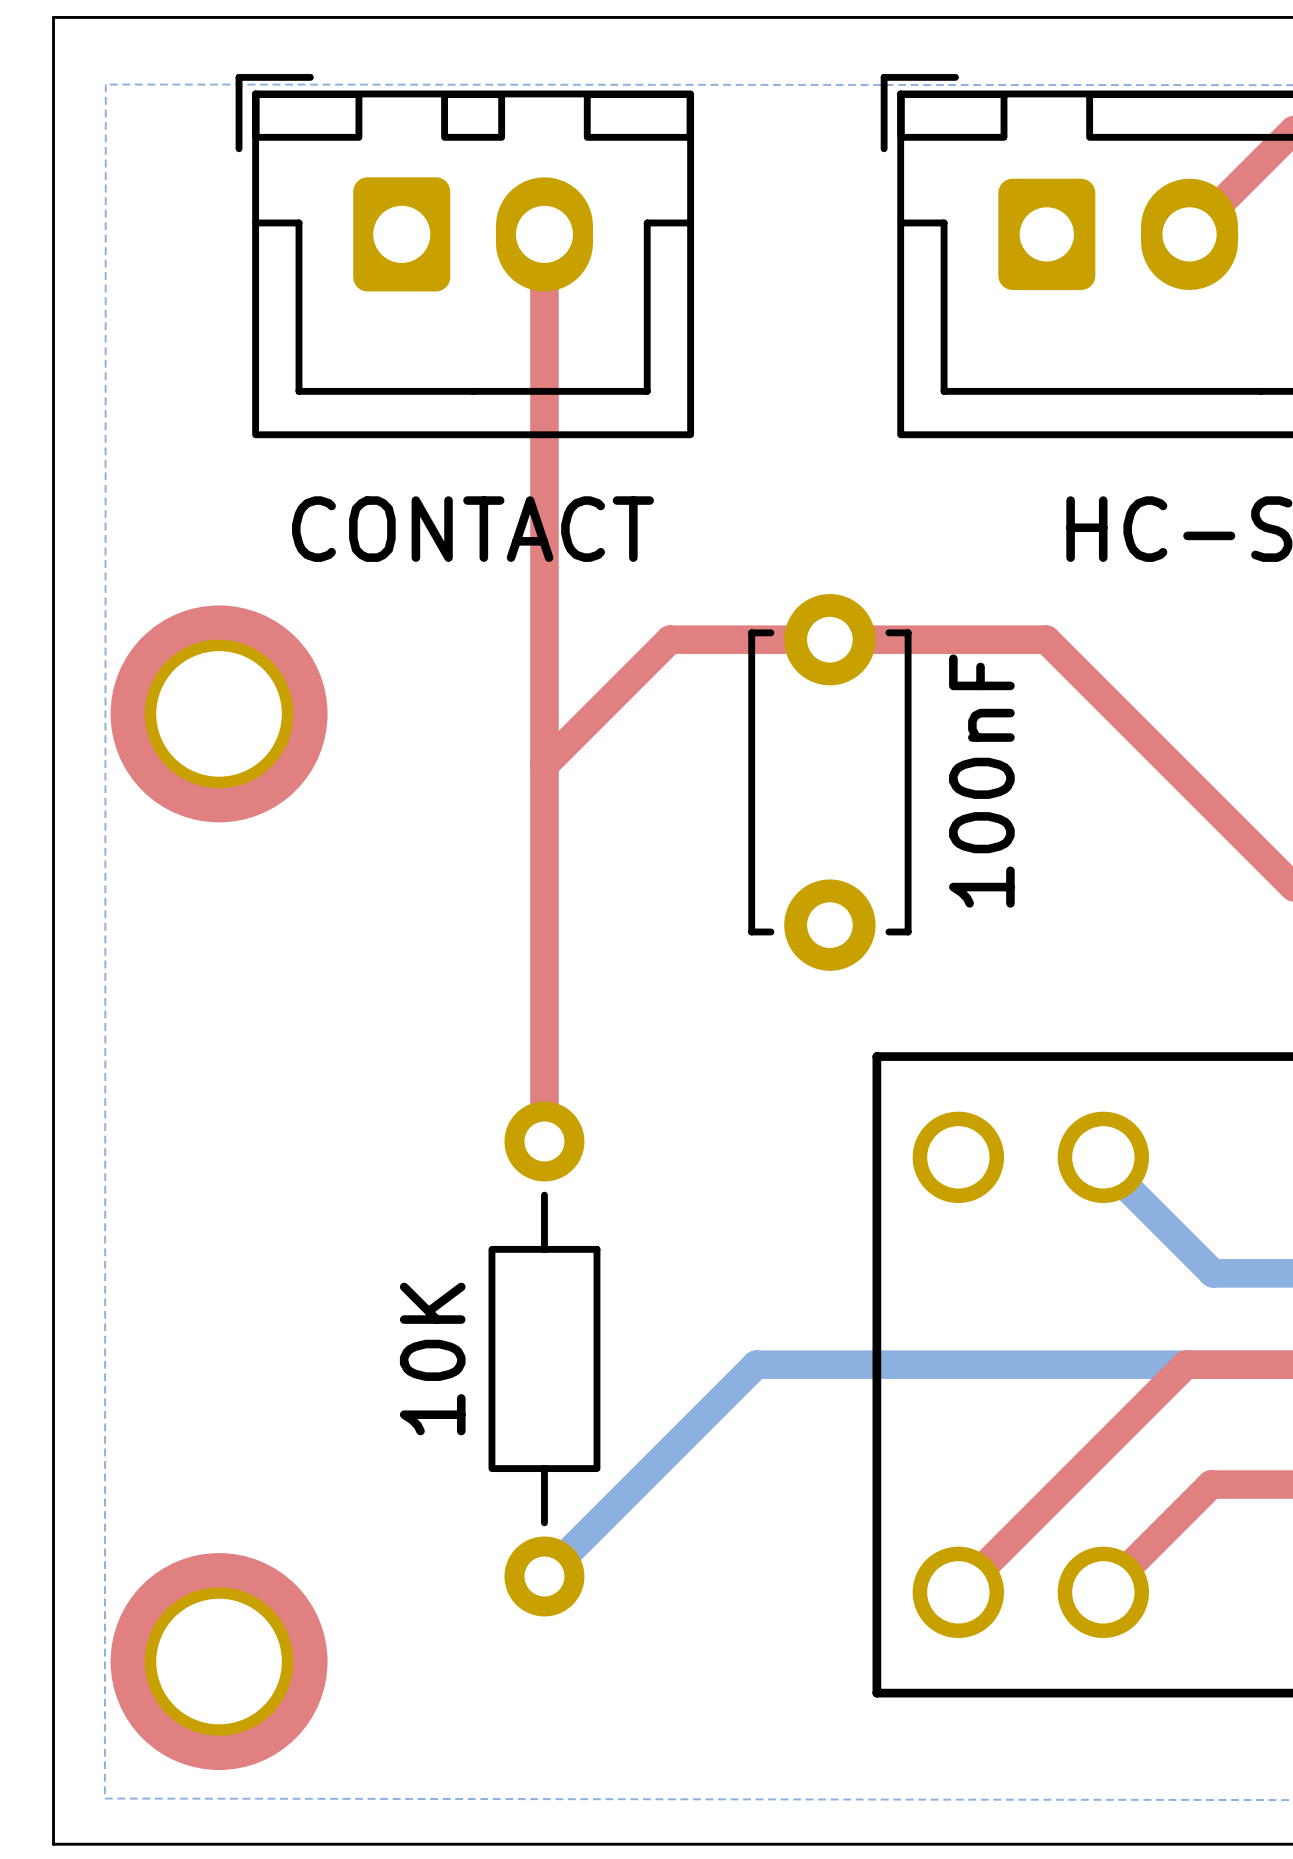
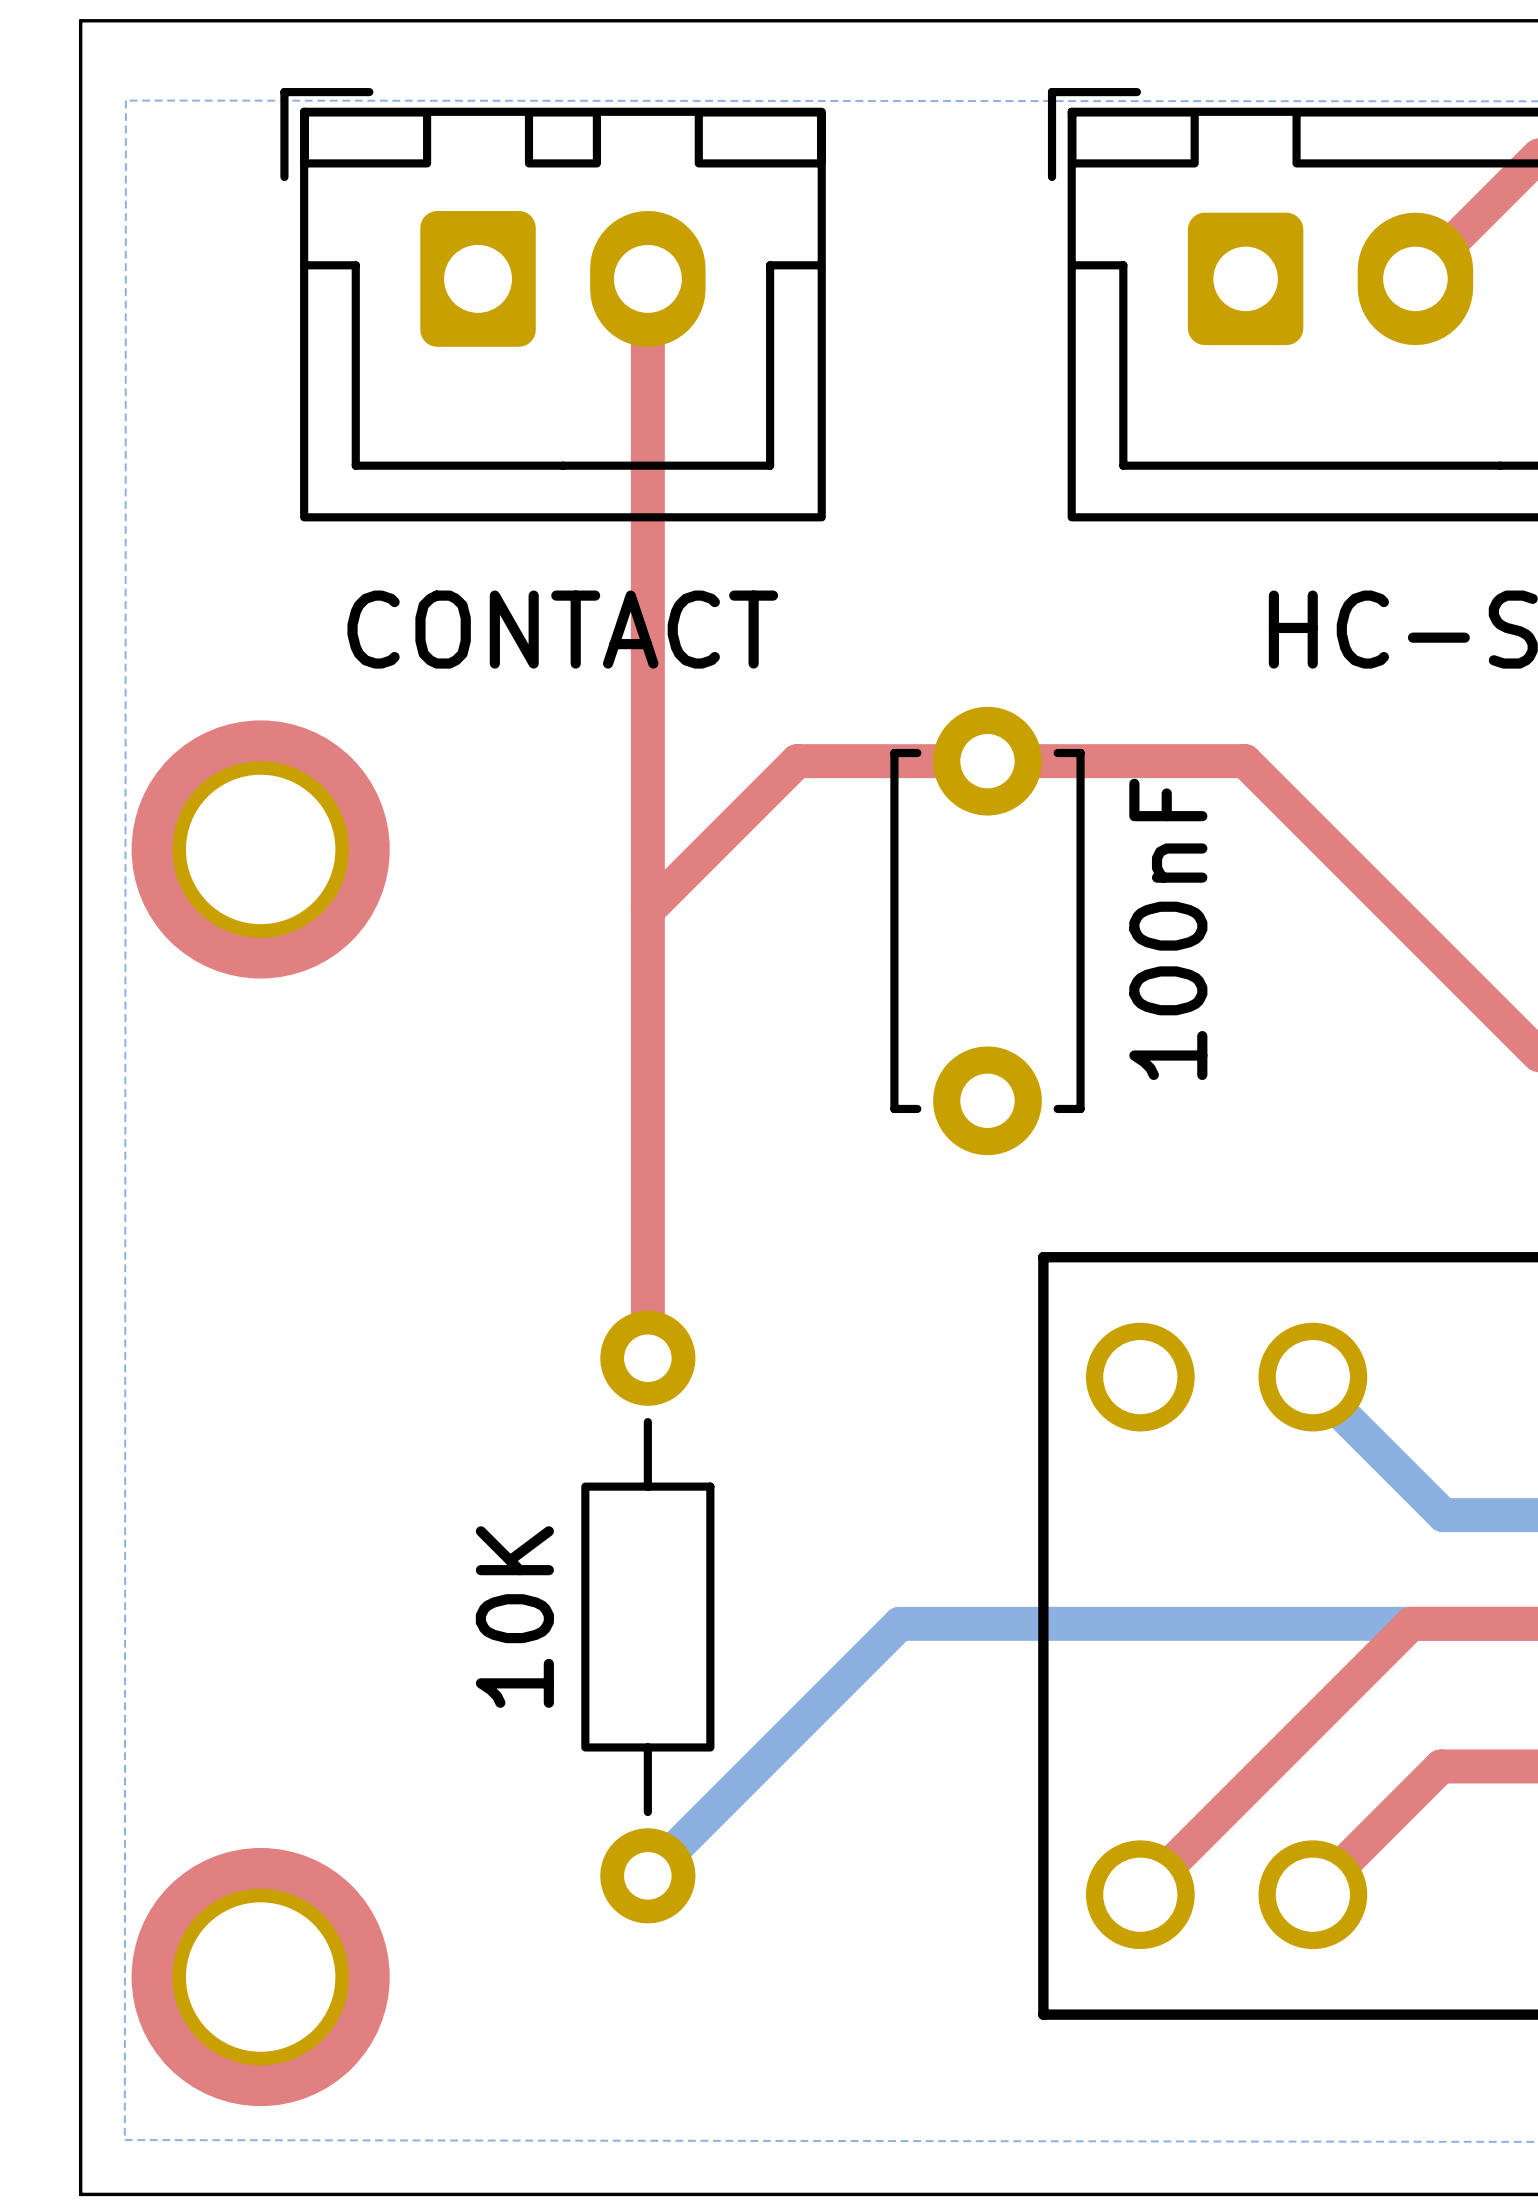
board edge: (67, 17) (53, 17) (53, 1844) (67, 1844) -> (80, 20) (80, 2194)

